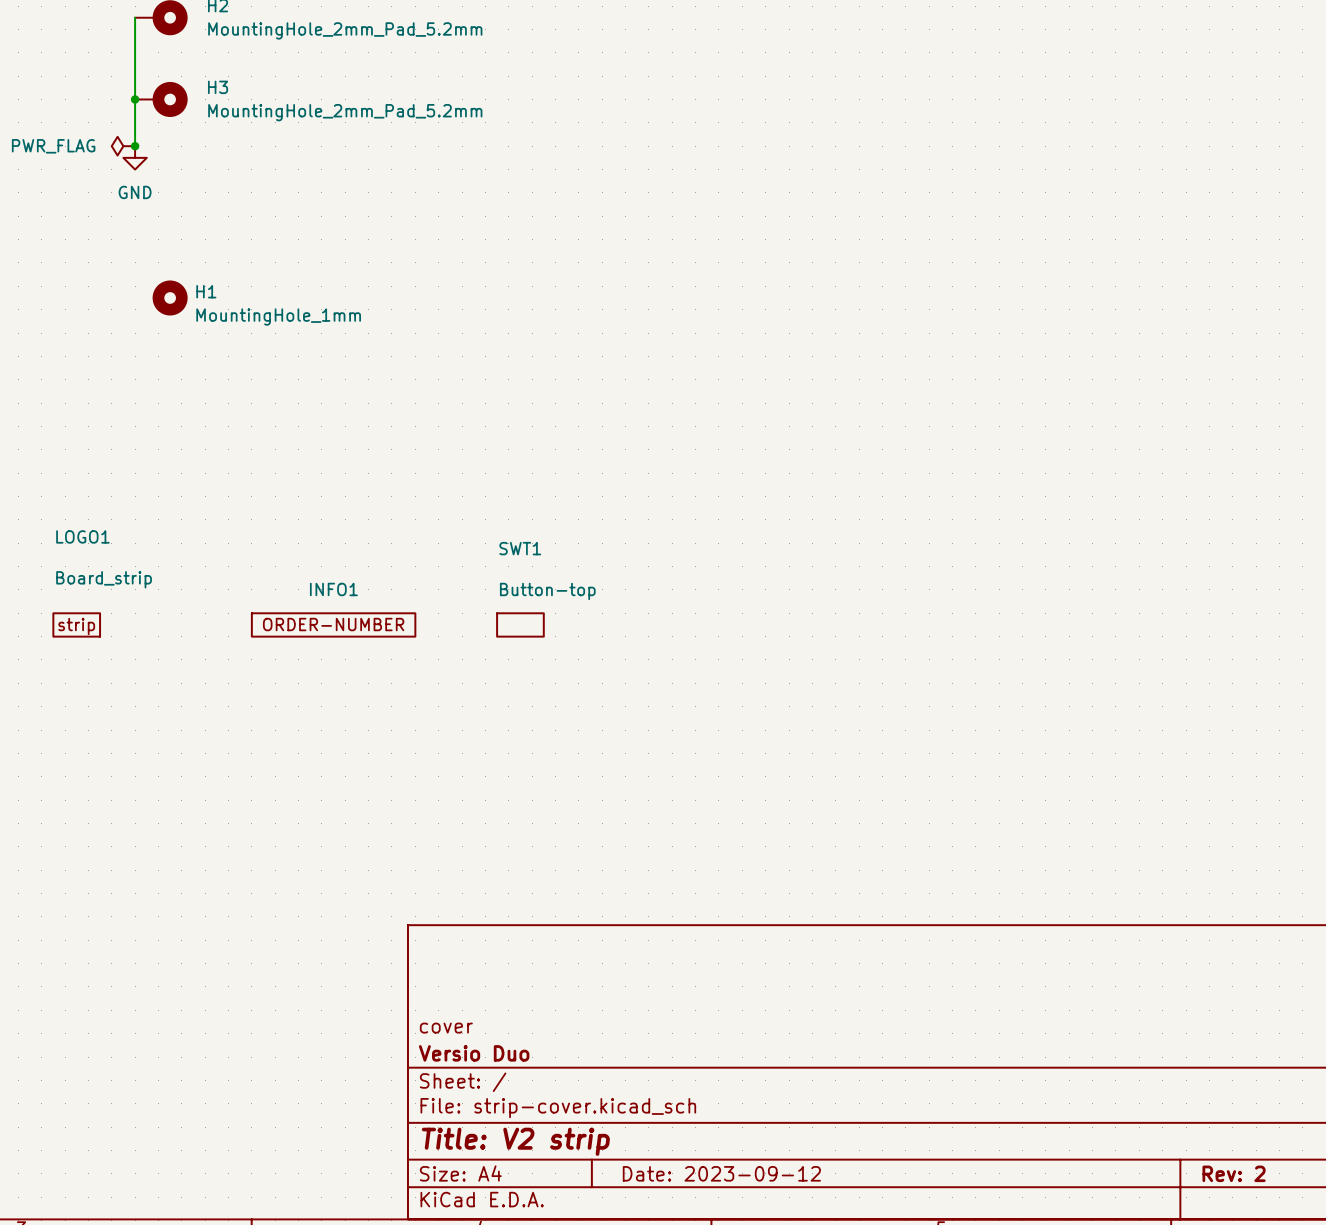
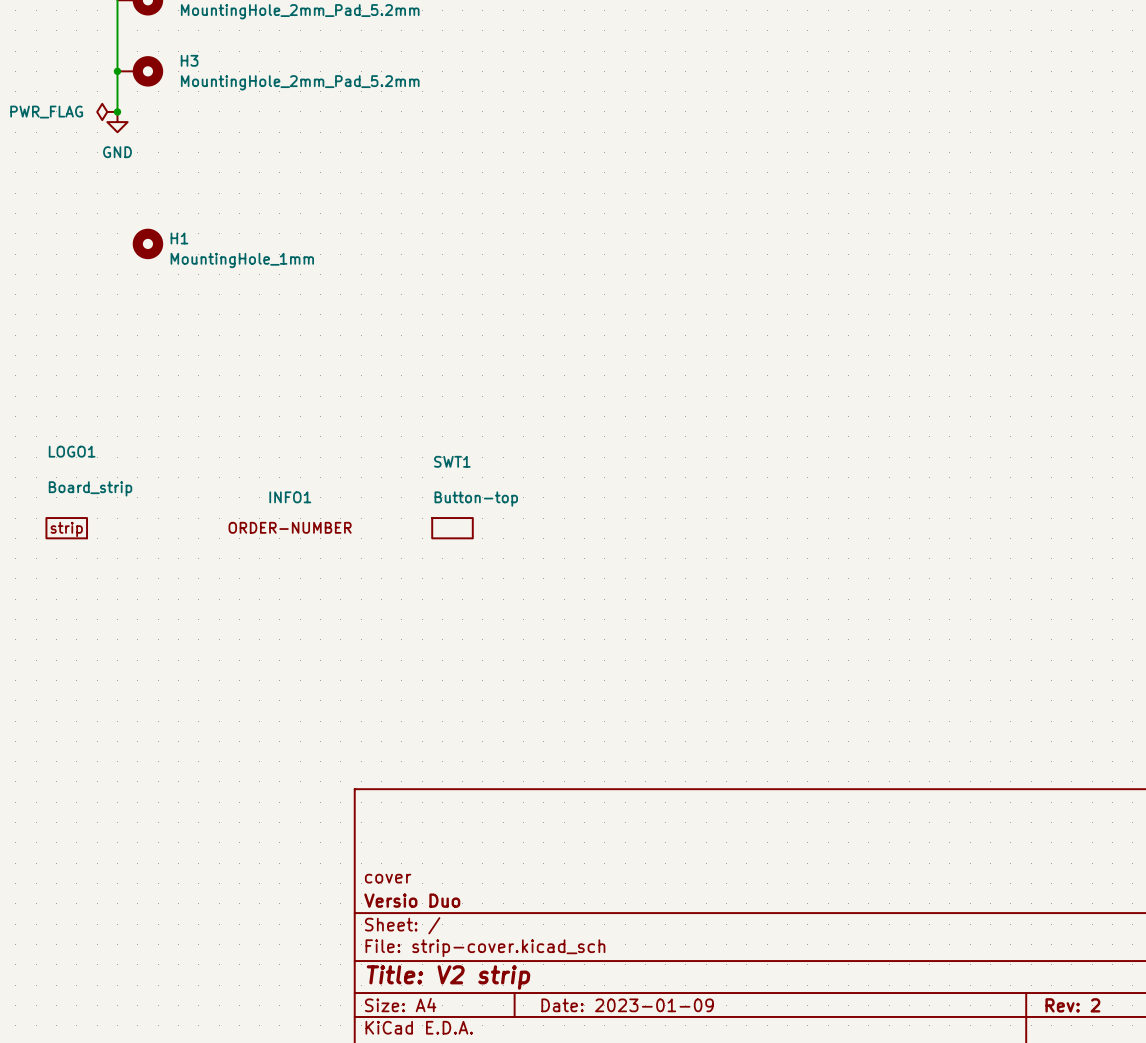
INFO1 symbol: [251, 613, 416, 637] -> [228, 491, 352, 534]
title block: Date: 2023-09-12 (721, 1173) -> Date: 2023-01-09 (627, 1005)

